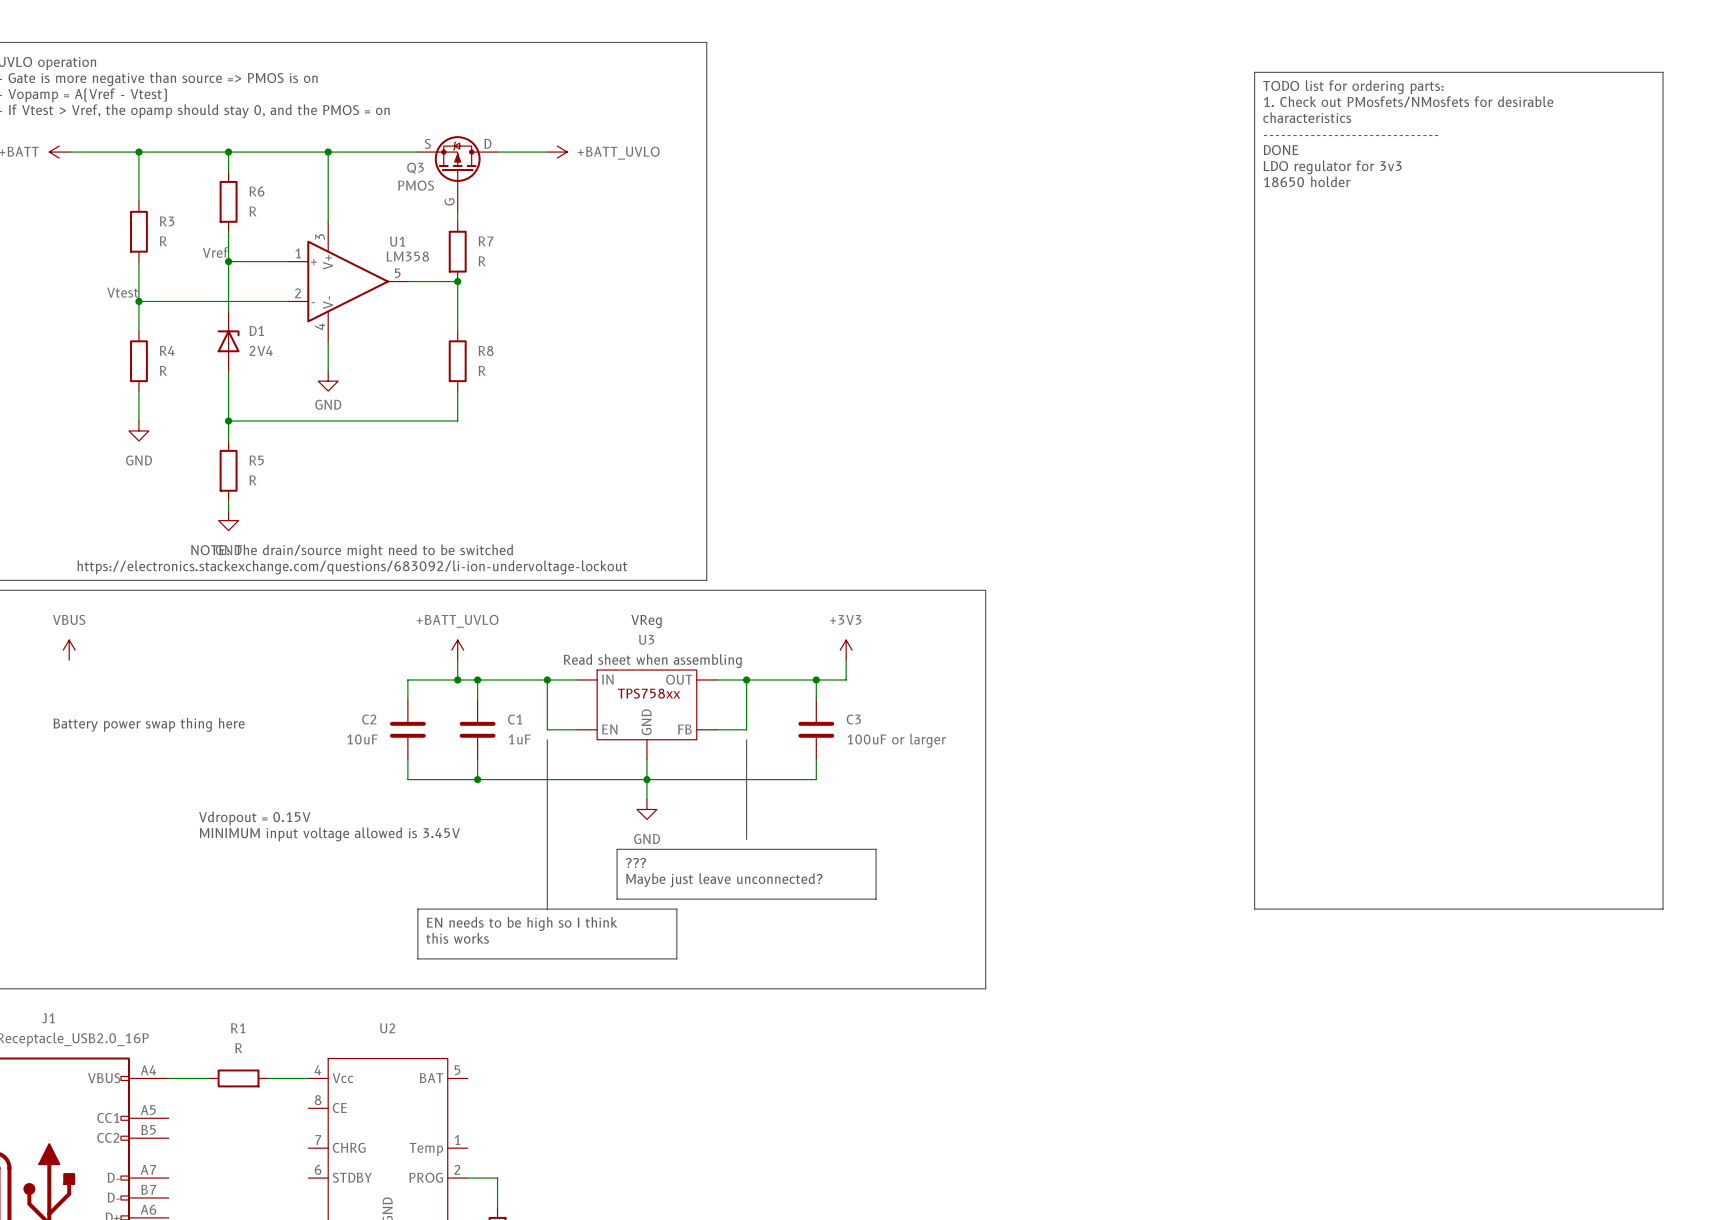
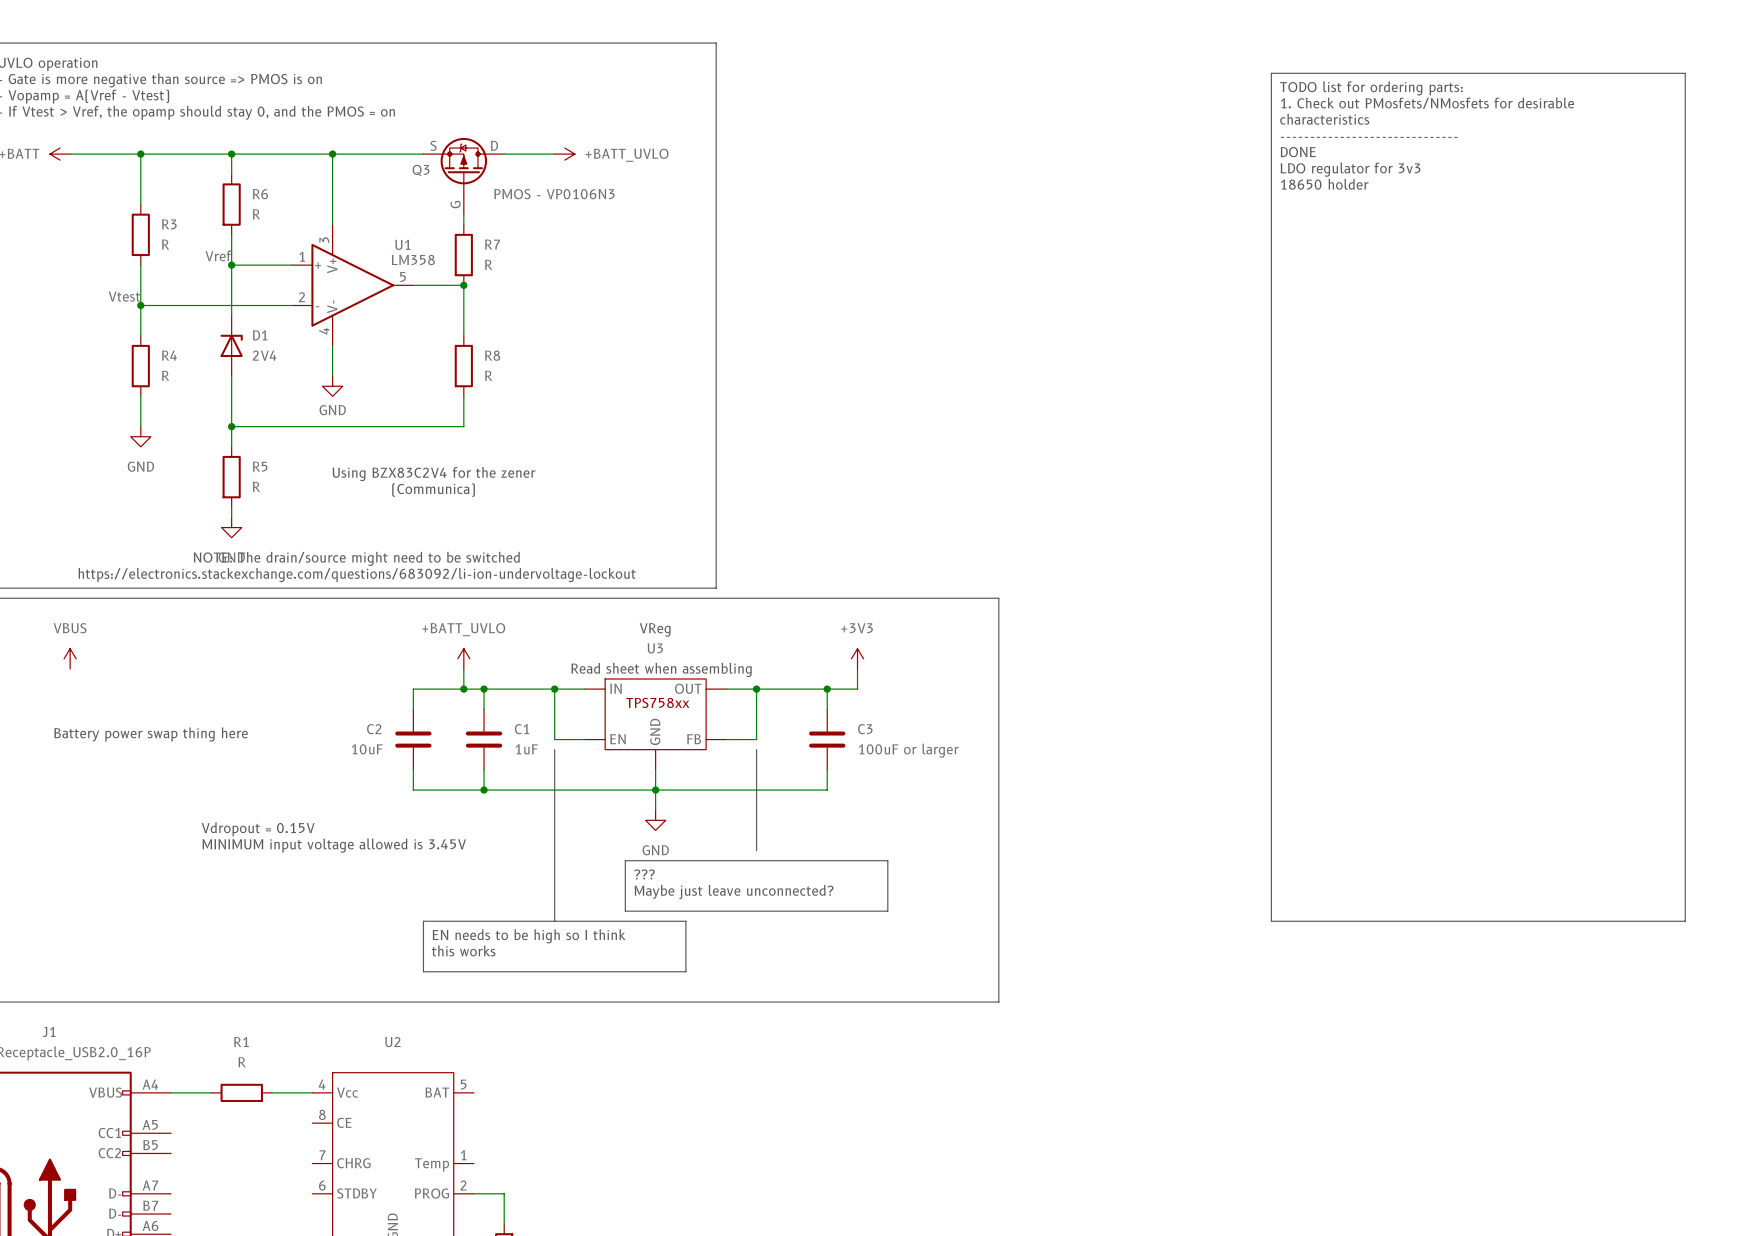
Q3 value: PMOS (416, 185) -> PMOS - VP0106N3 (554, 194)
text: none -> Using BZX83C2V4 for the zener (434, 474)
text: none -> (Communica) (433, 490)

